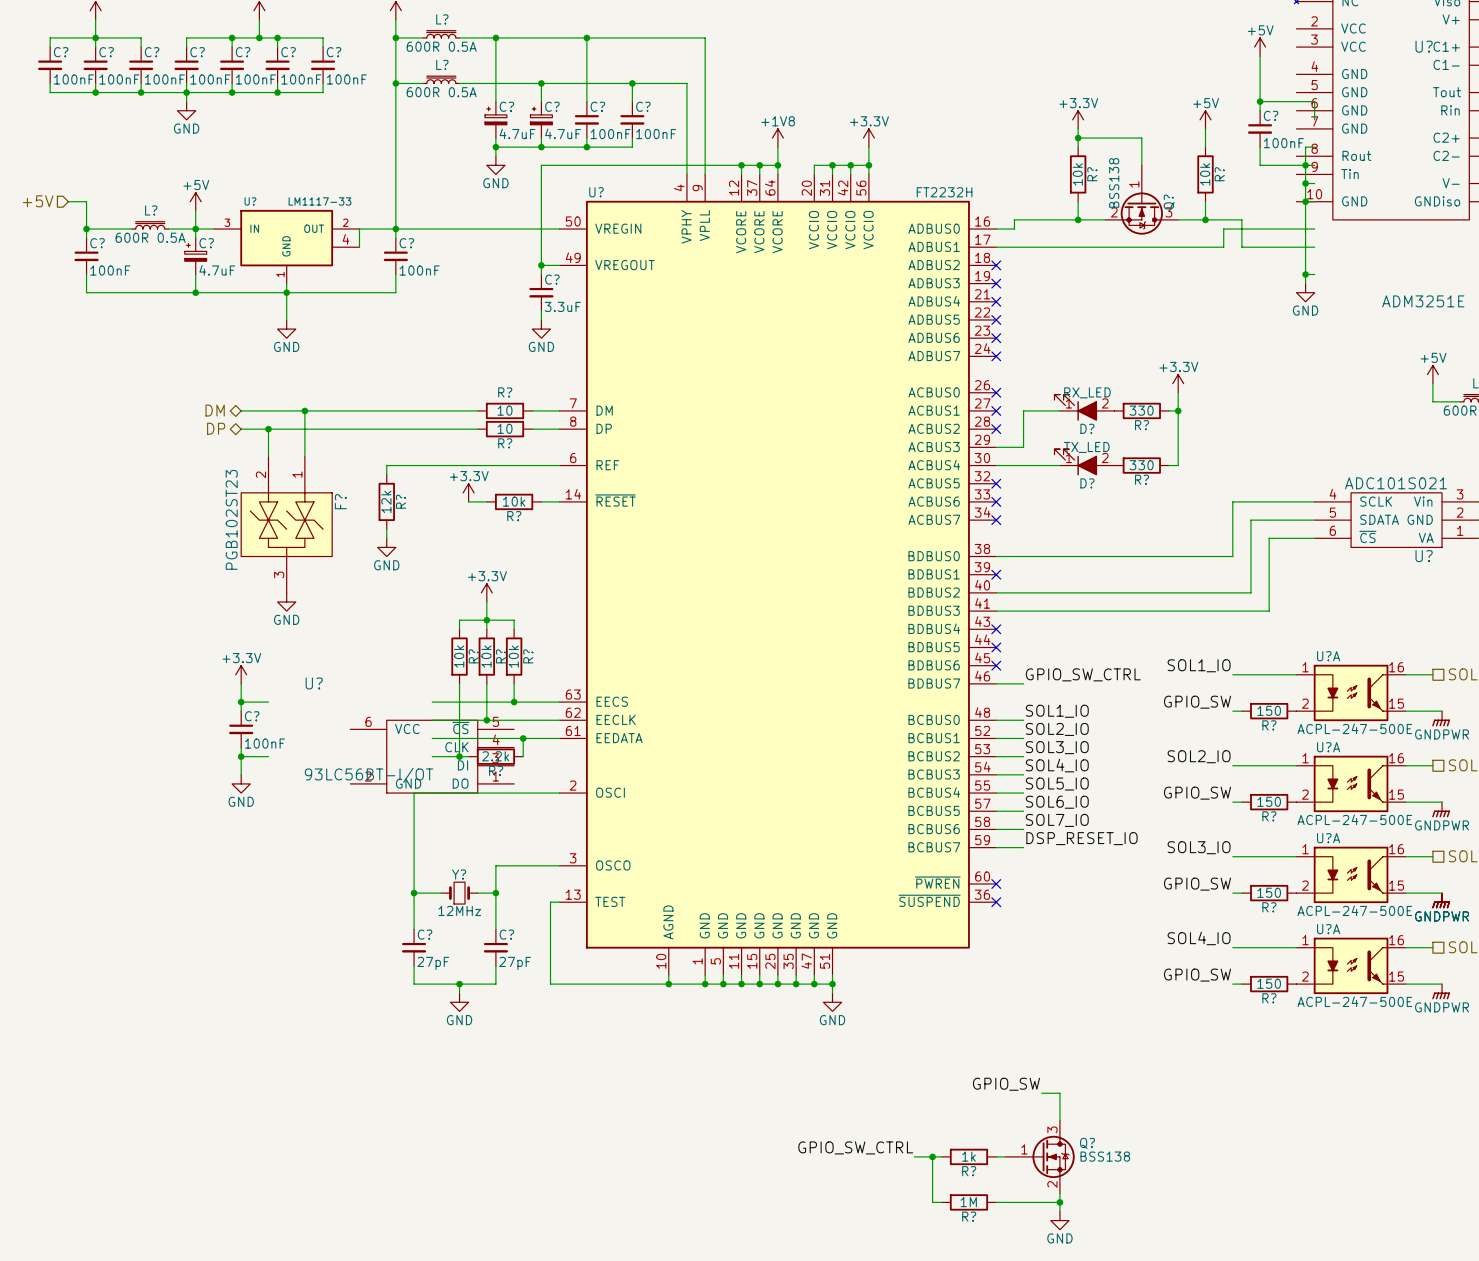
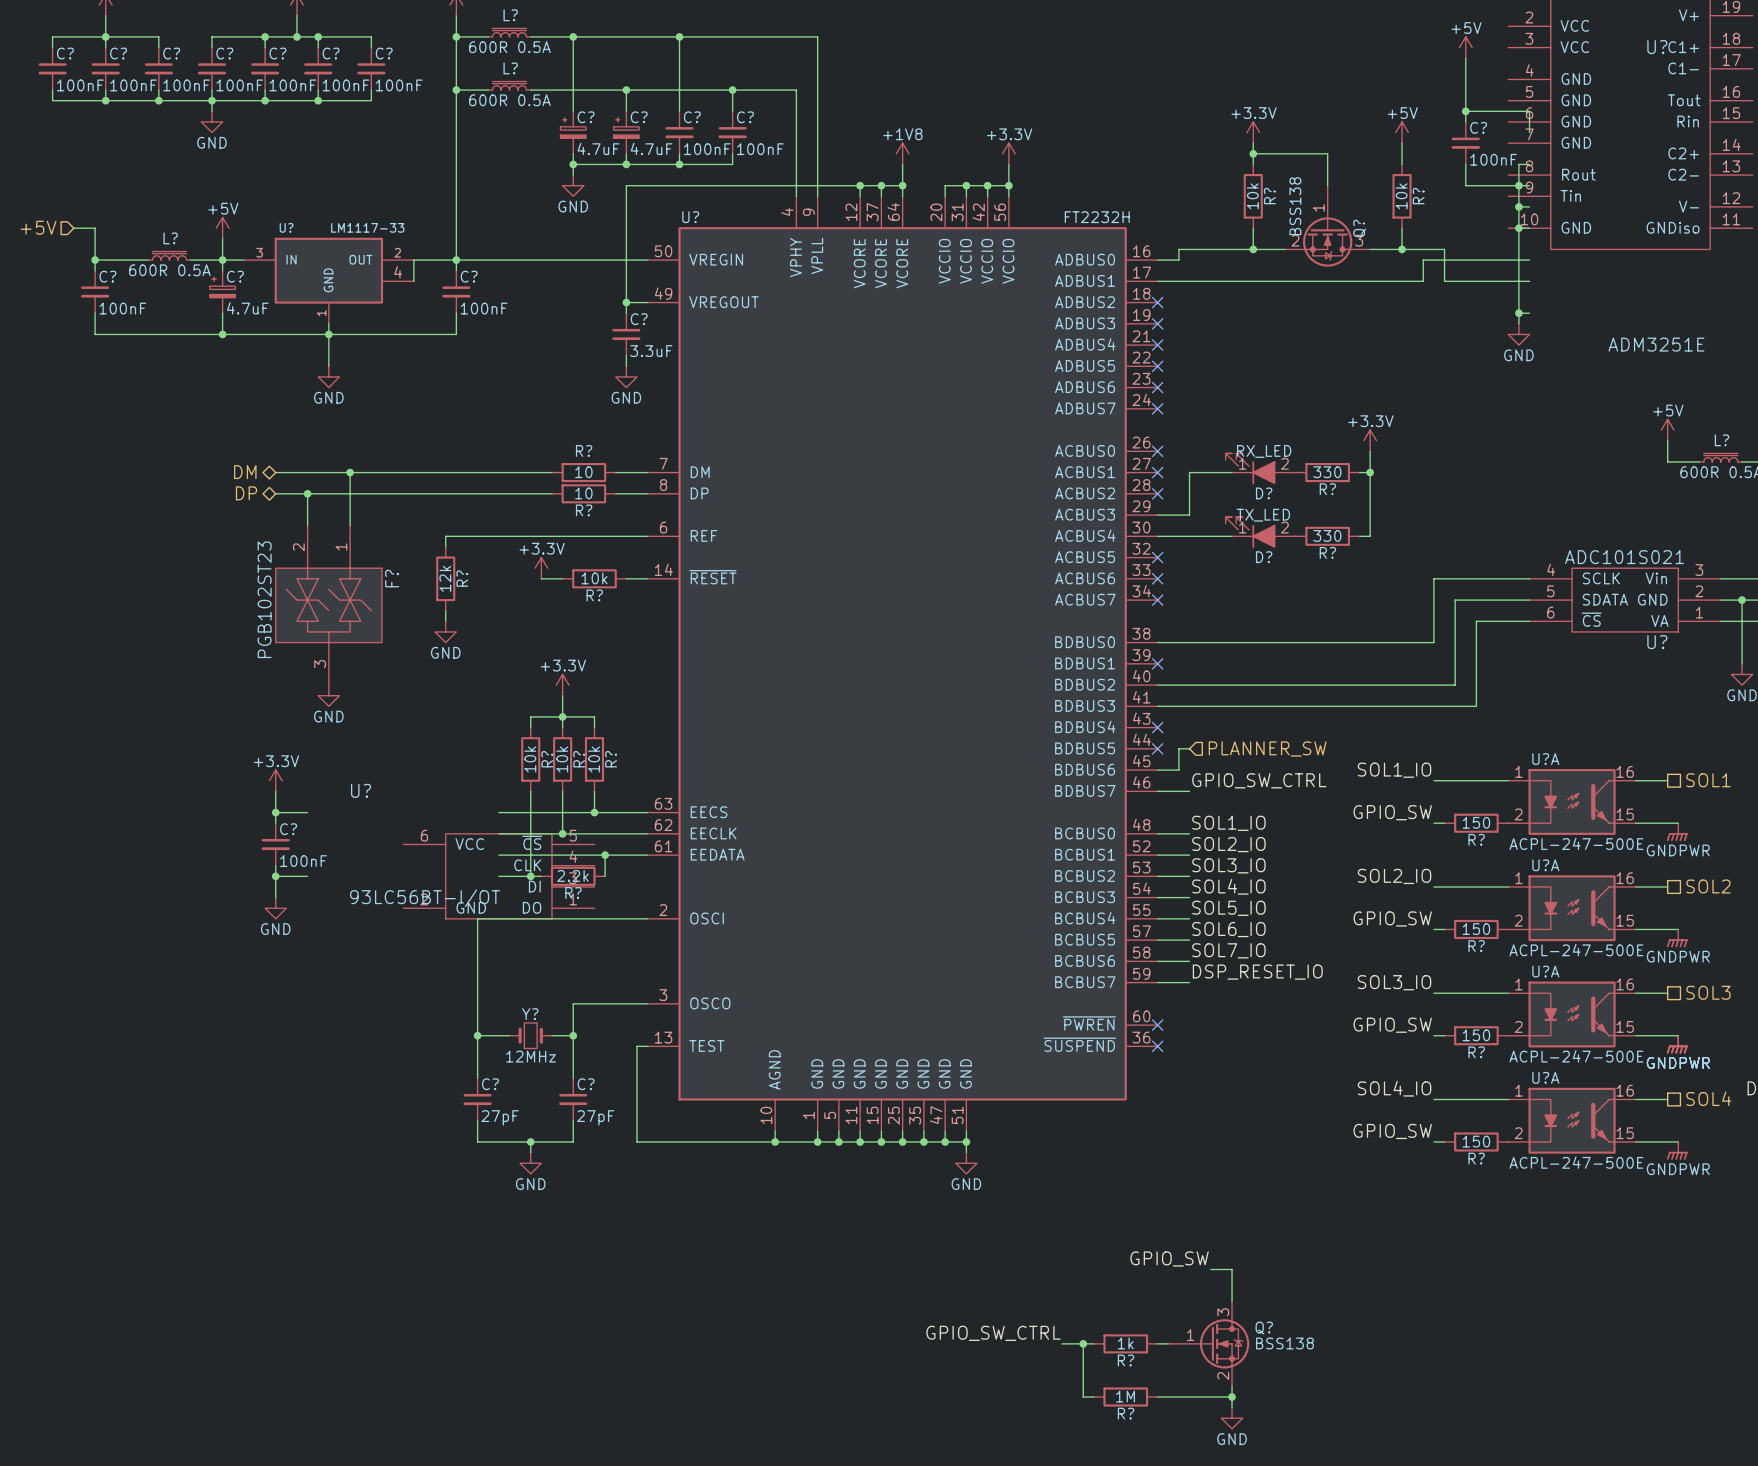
wire: none -> (1189, 748) (1178, 748) (1178, 770) (1157, 770)
hierarchical label: none -> PLANNER_SW (1267, 748)
no-connect mark: (996, 665) -> none

